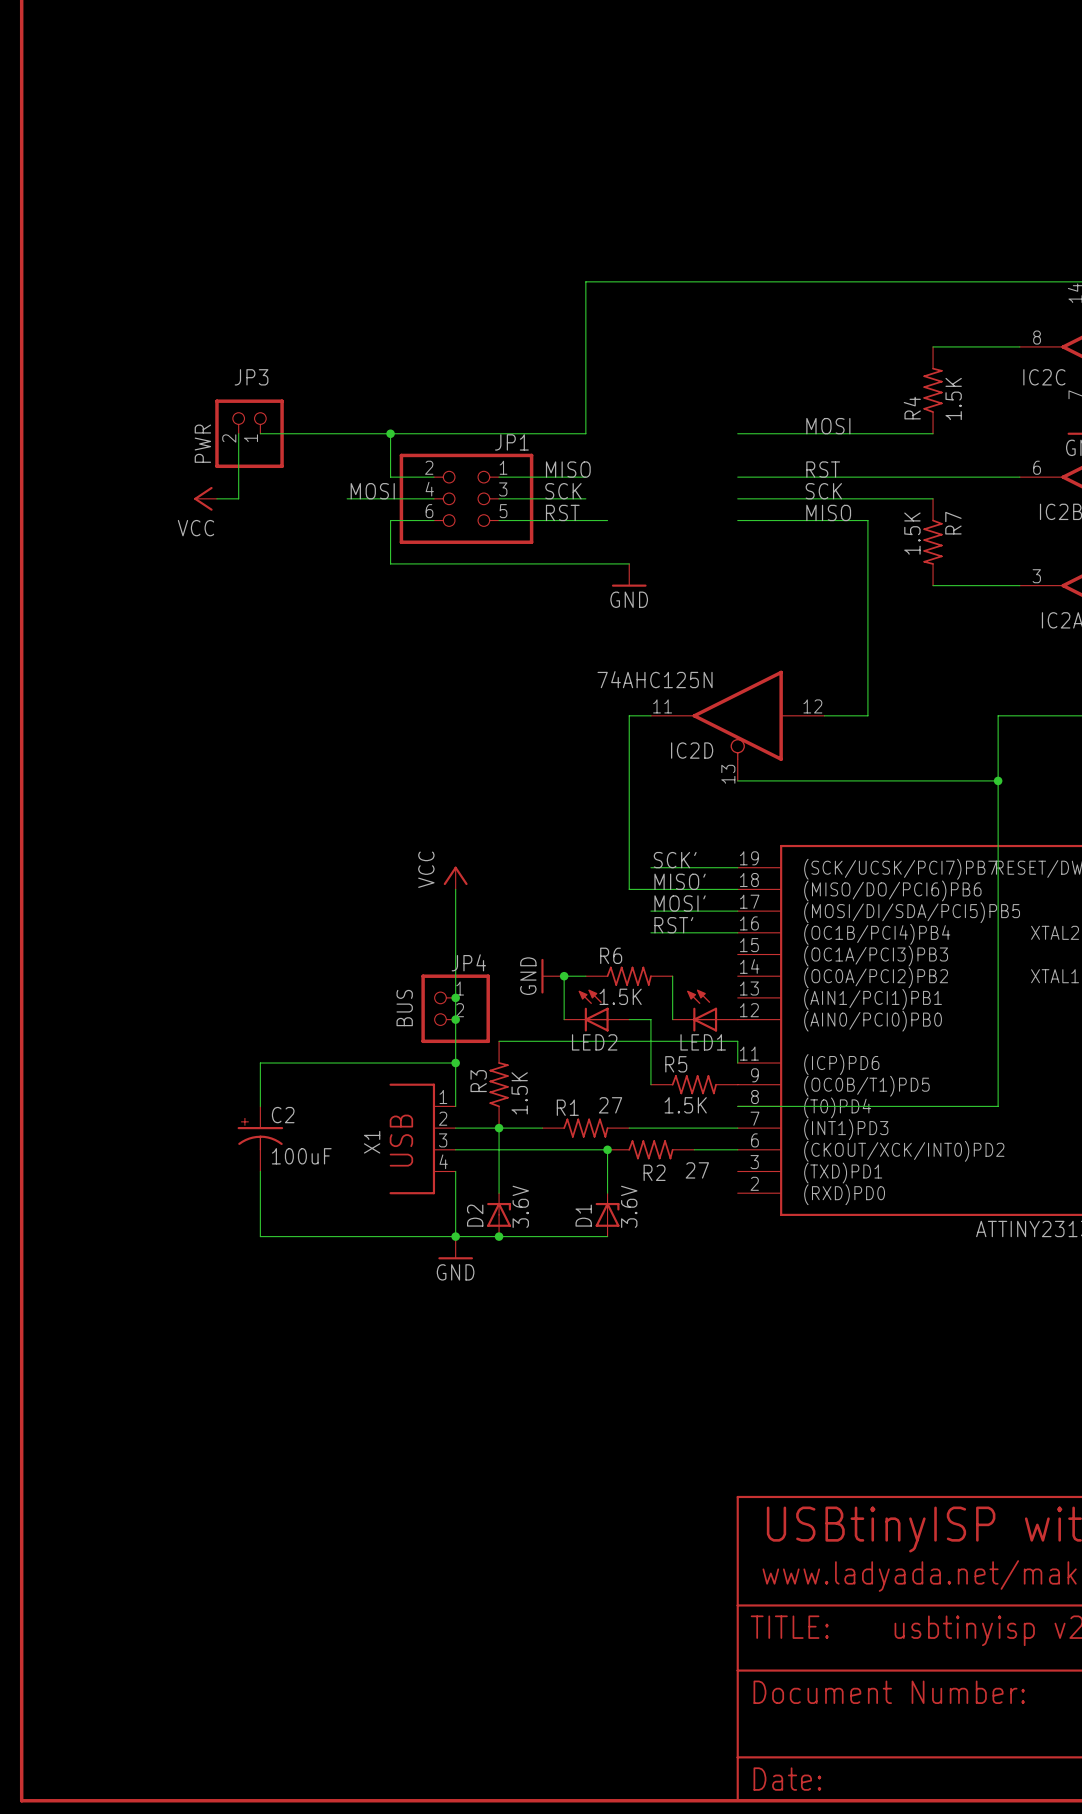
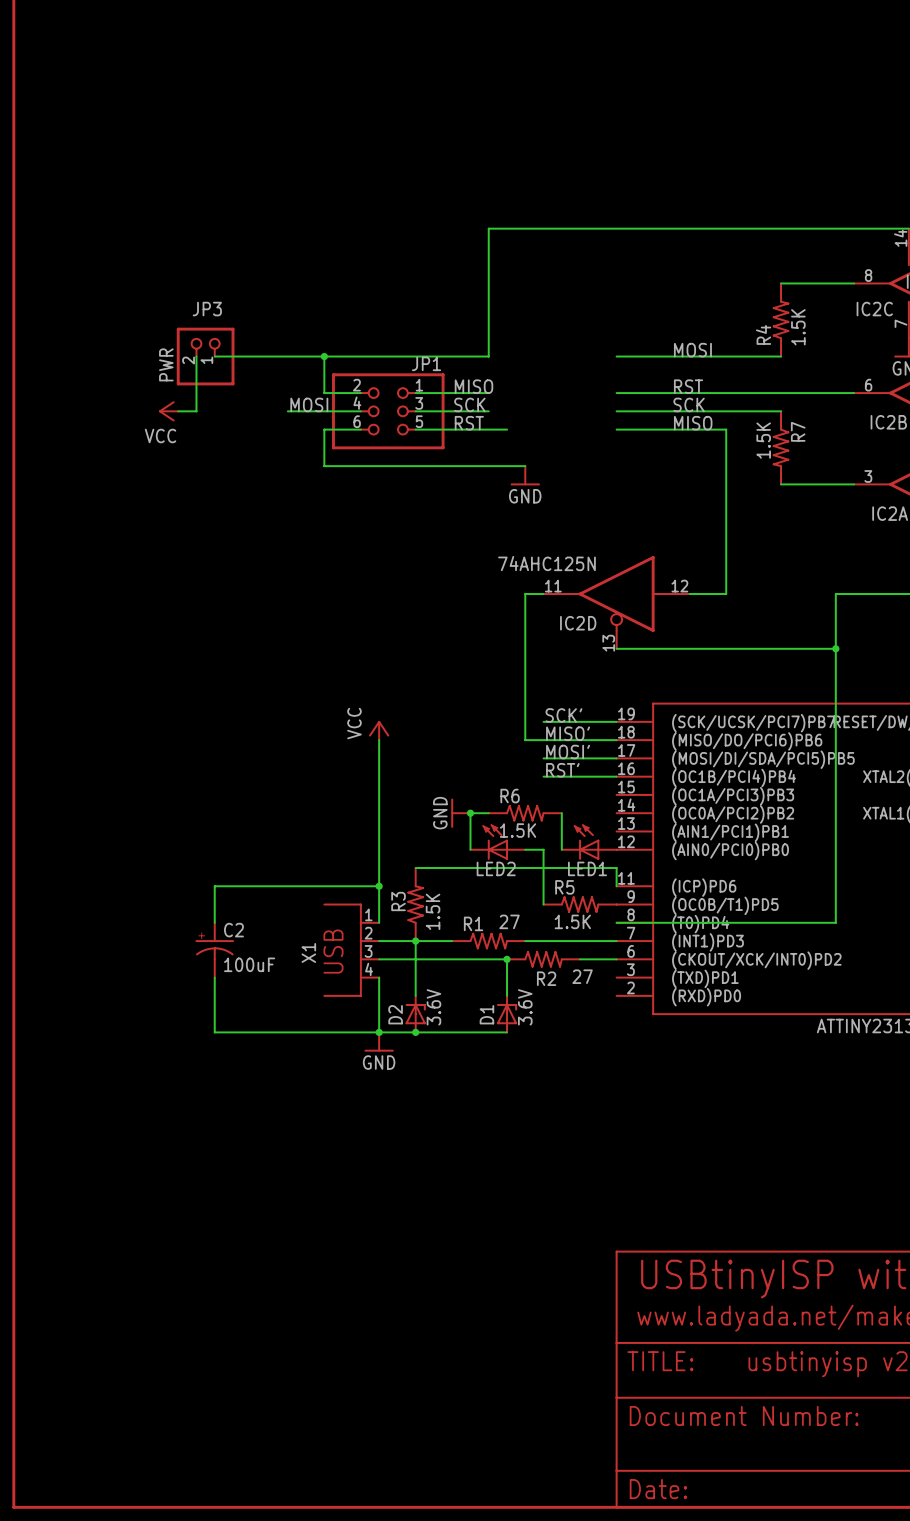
junction: (455, 997) -> none
JP4: BUS (455, 1008) -> none
junction: (455, 1019) -> none

